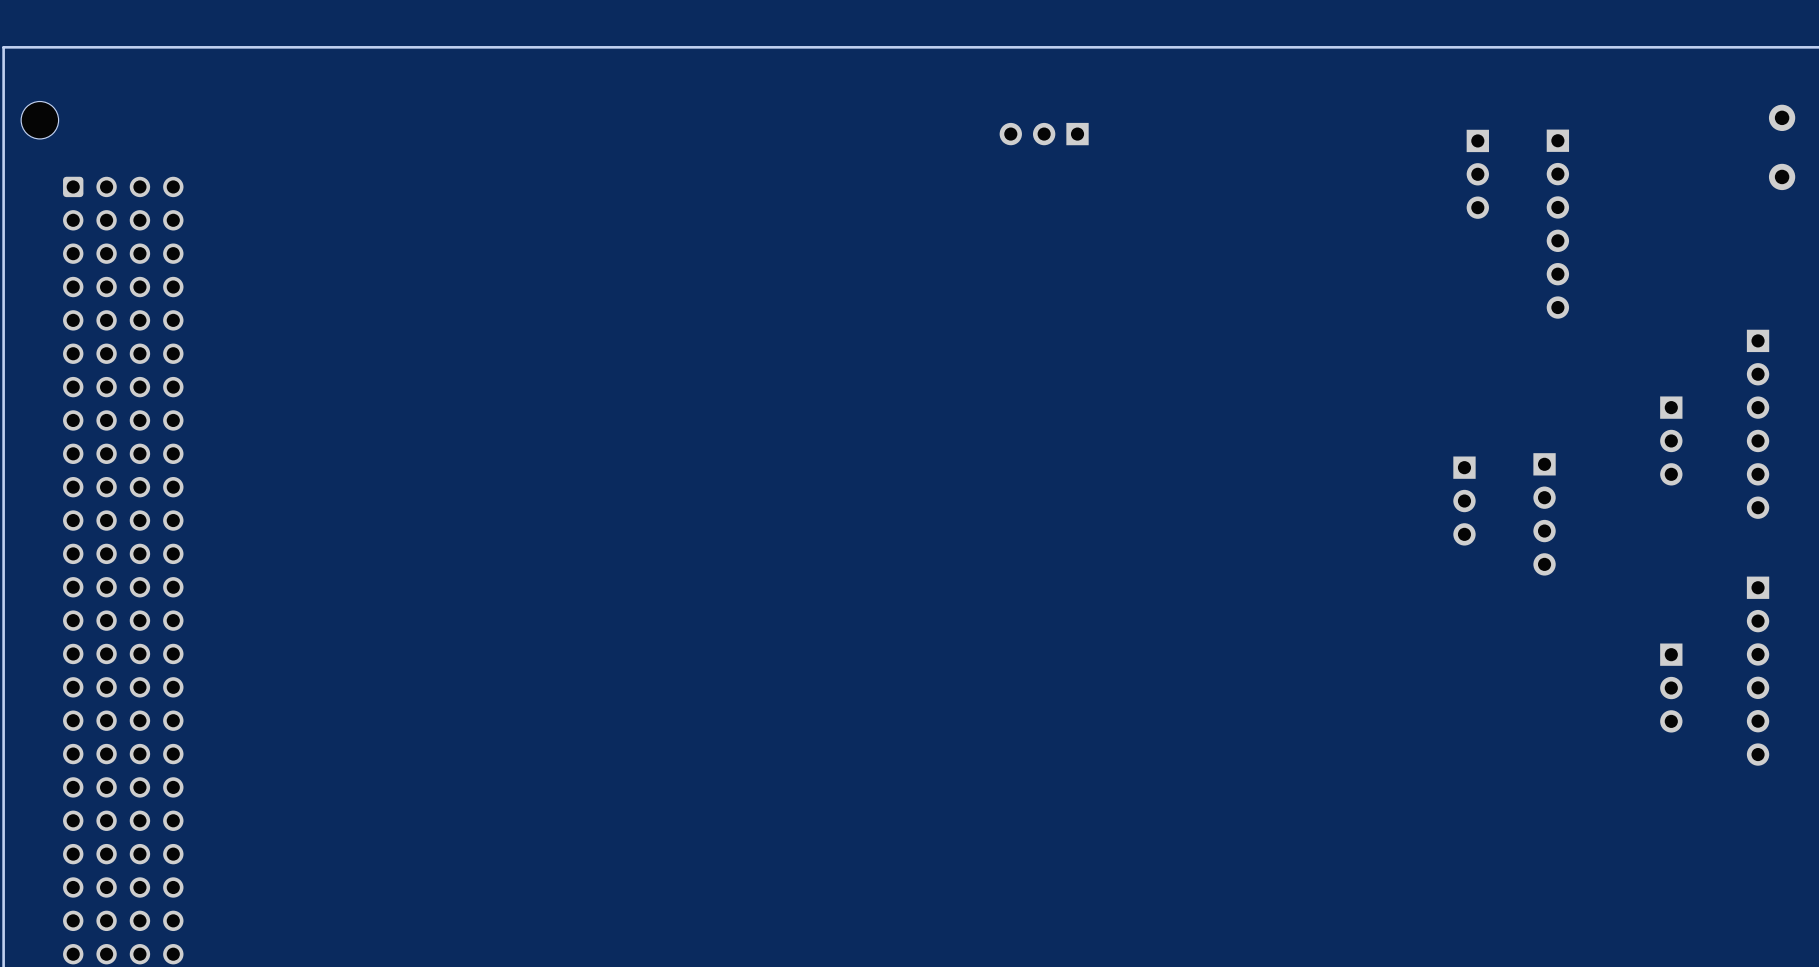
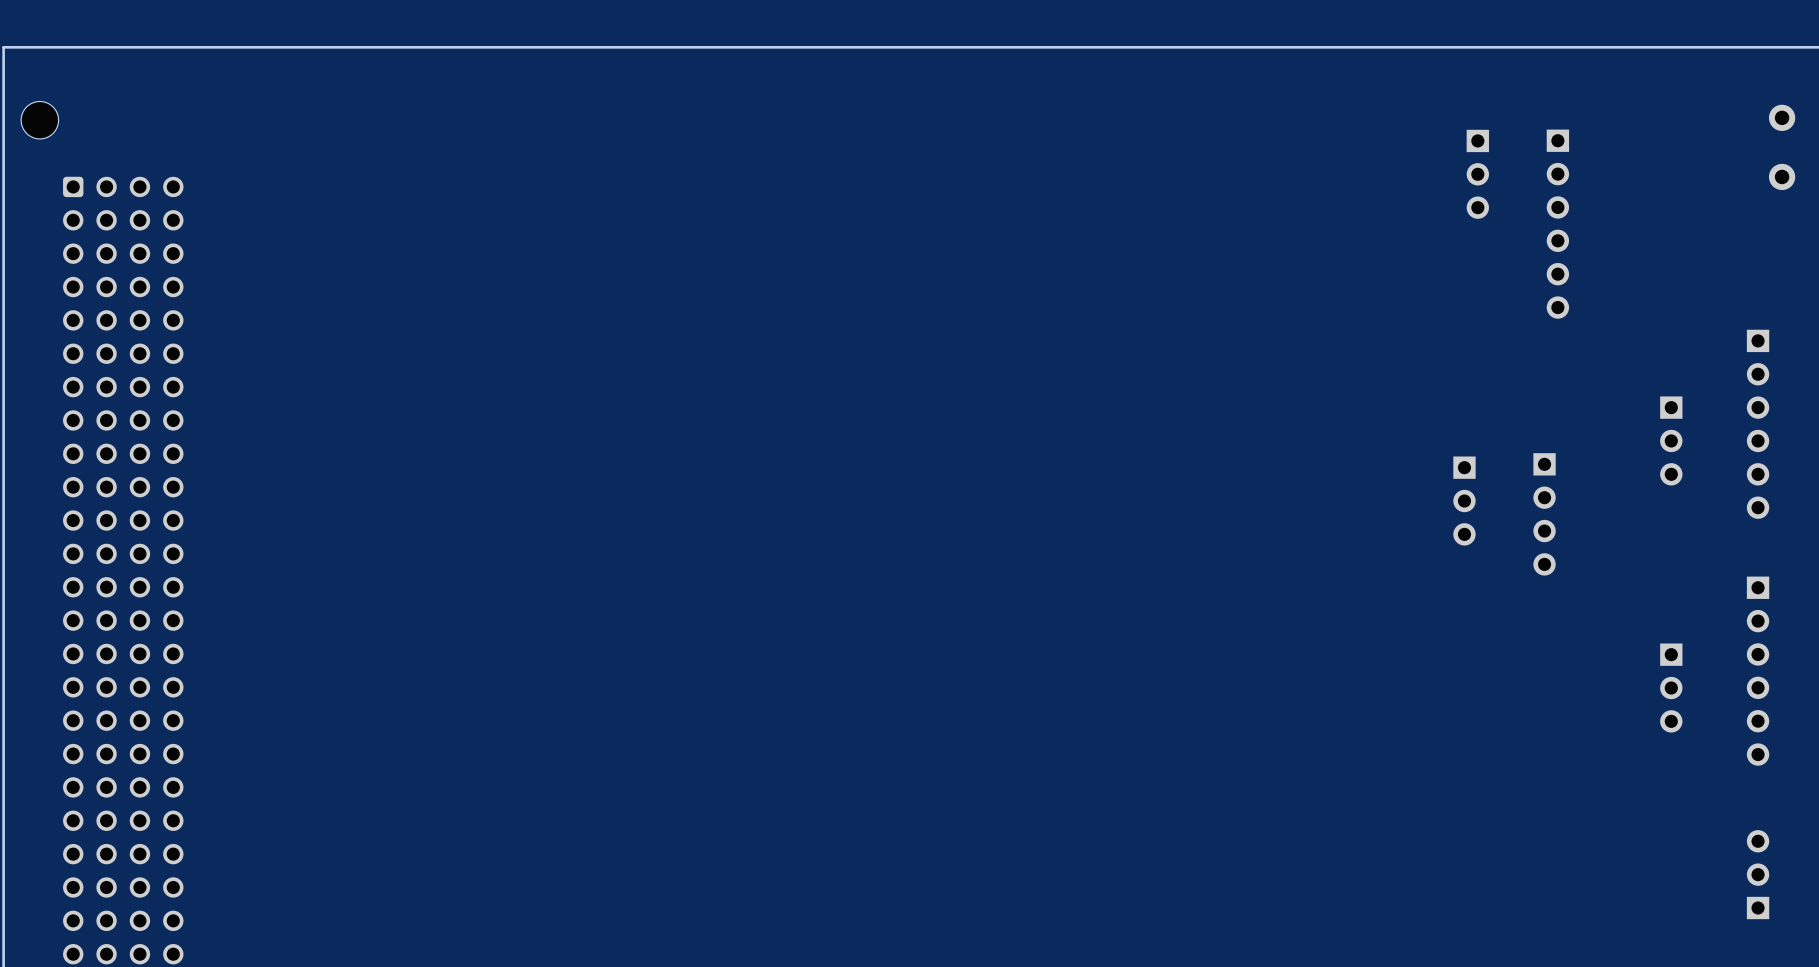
part: (1044, 134) -> none
part: none -> (1758, 874)

